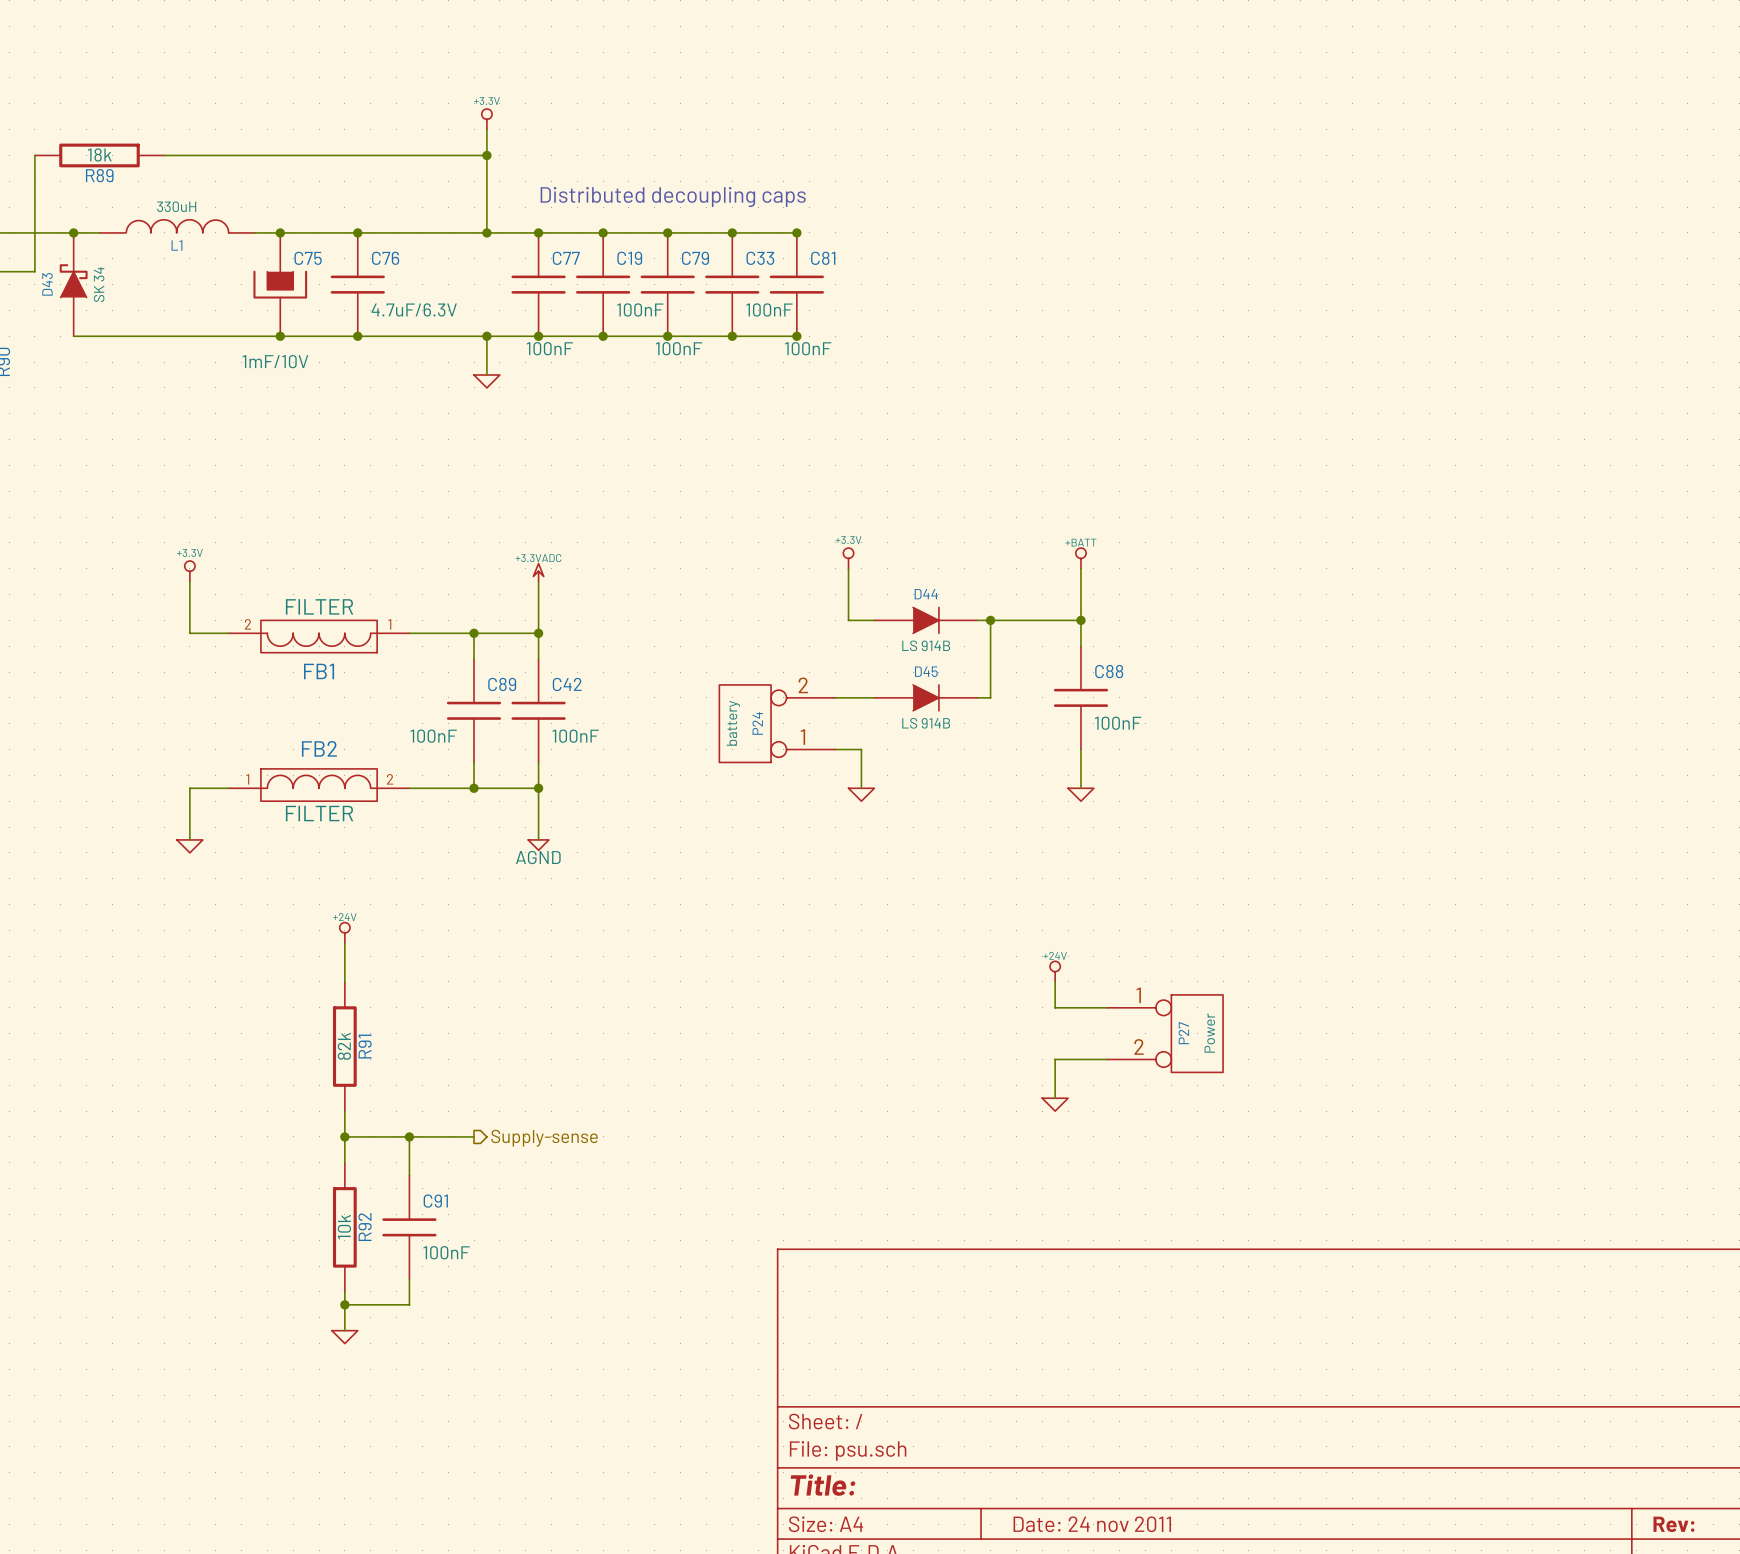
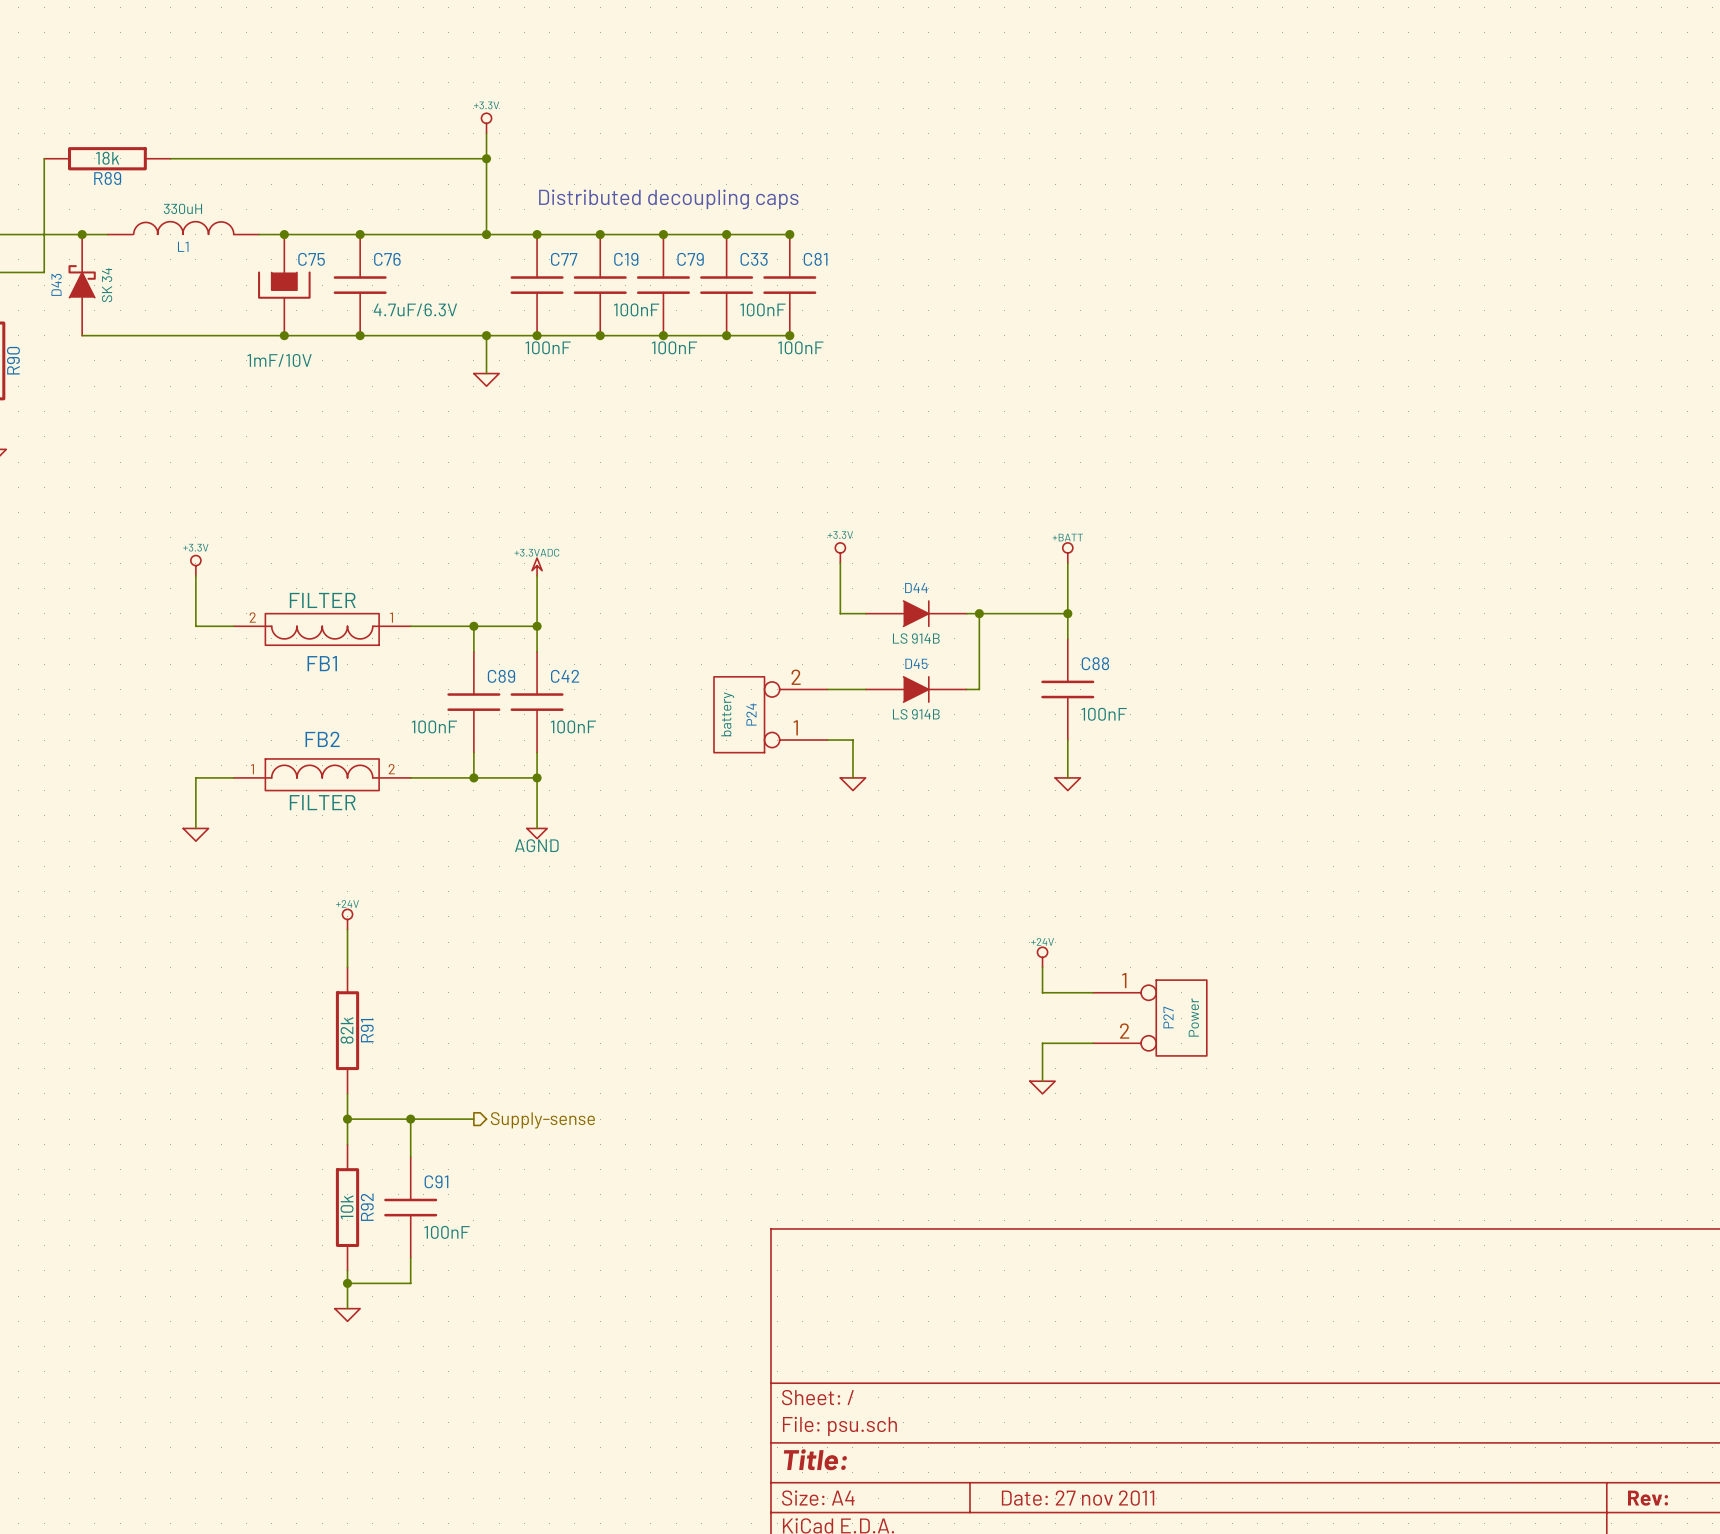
title block: Date: 24 nov 2011 (1092, 1524) -> Date: 27 nov 2011 (1078, 1498)

